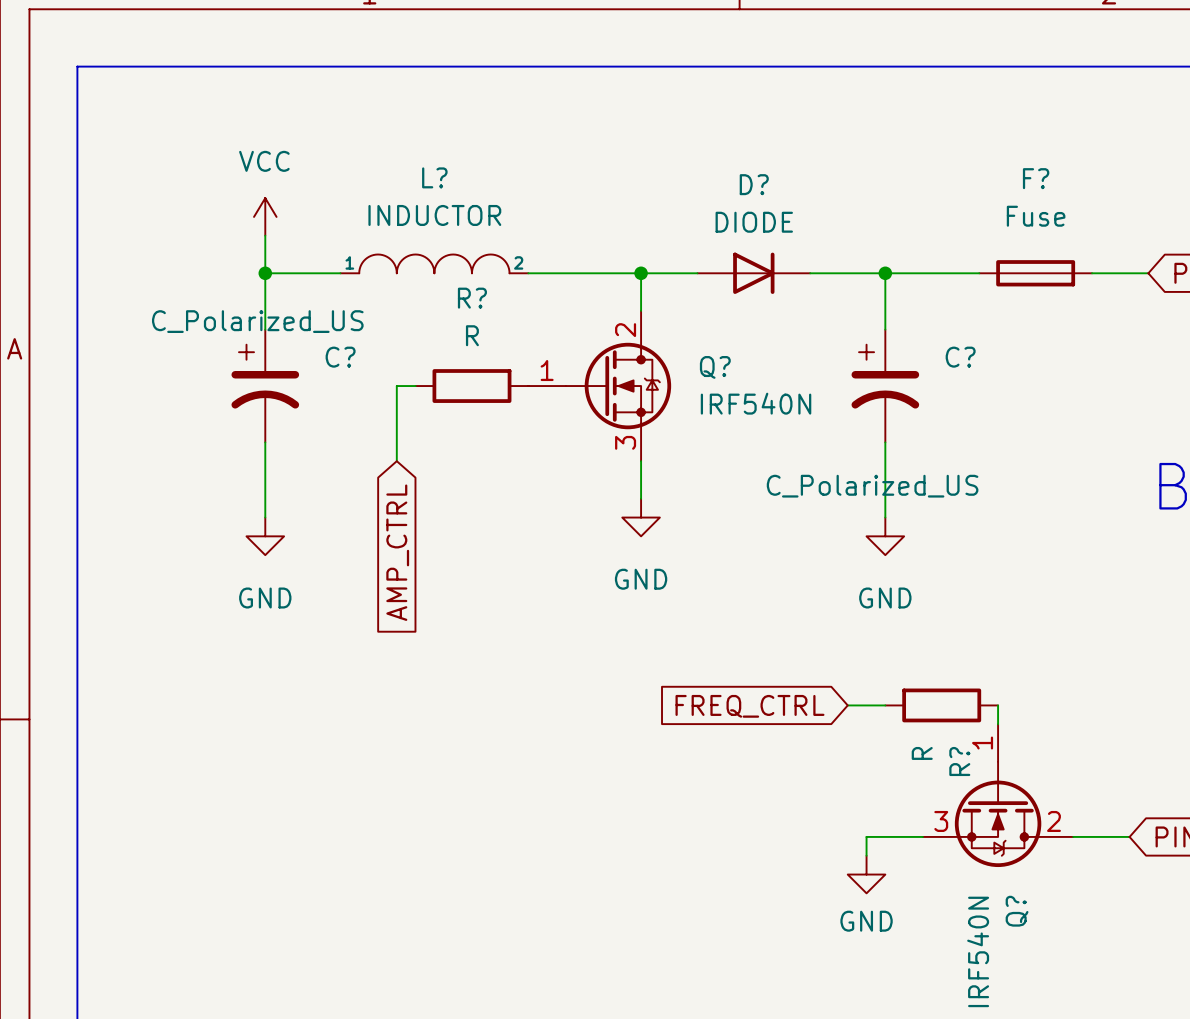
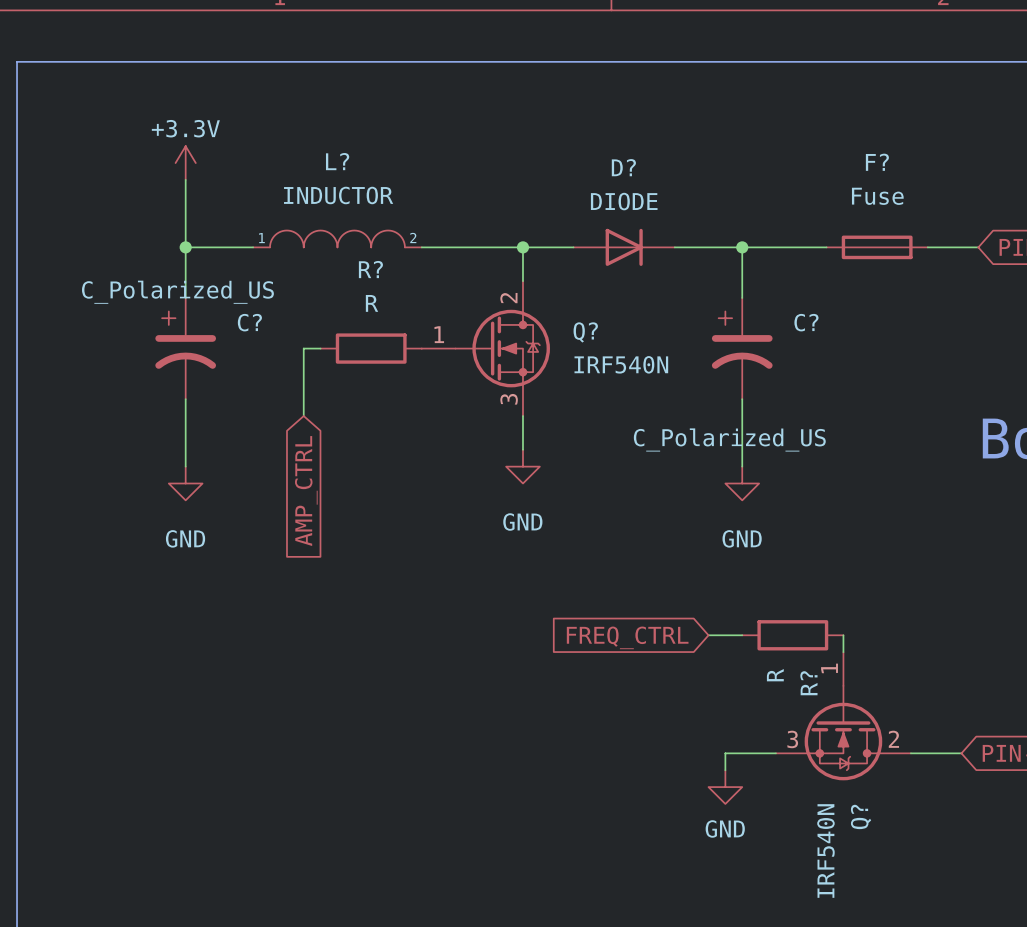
power symbol: none -> +3.3V (185, 163)
power symbol: VCC (265, 216) -> none

